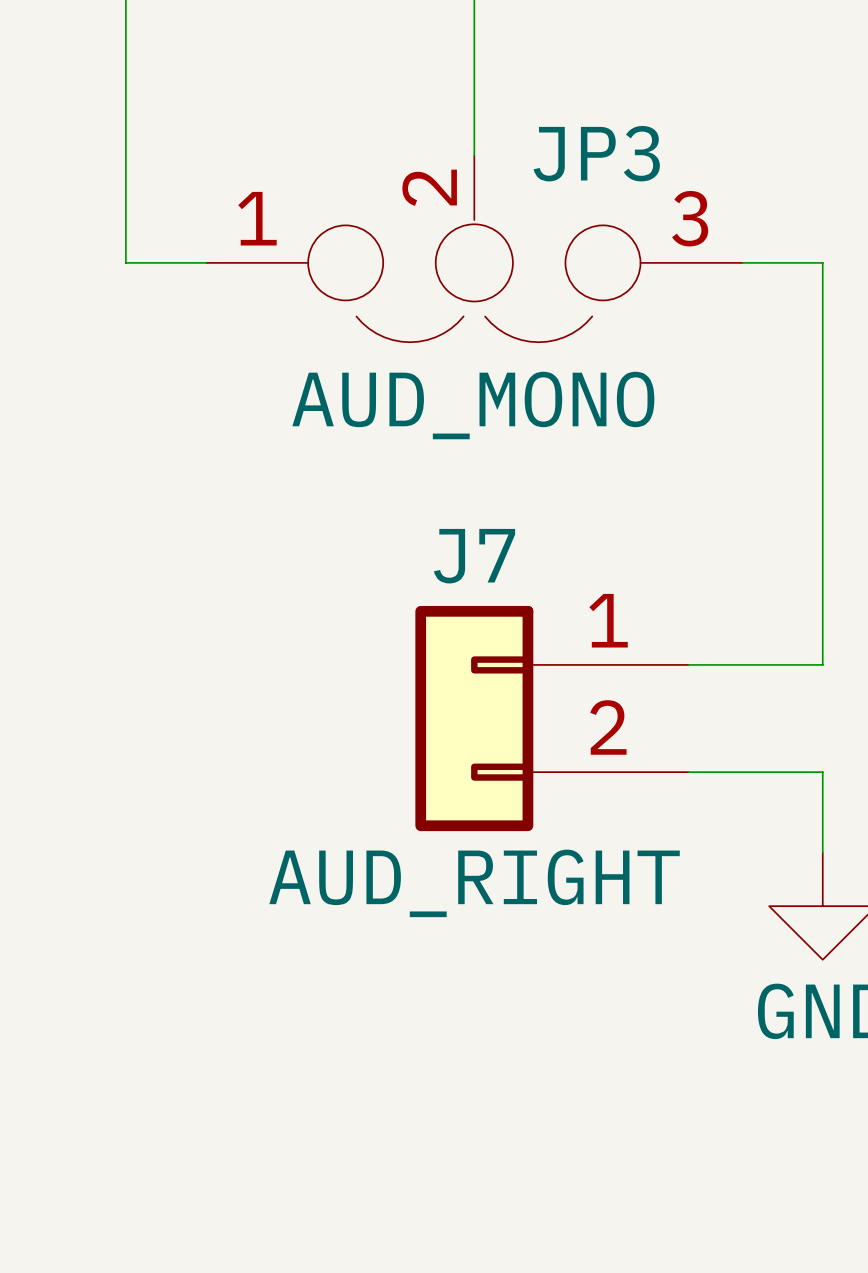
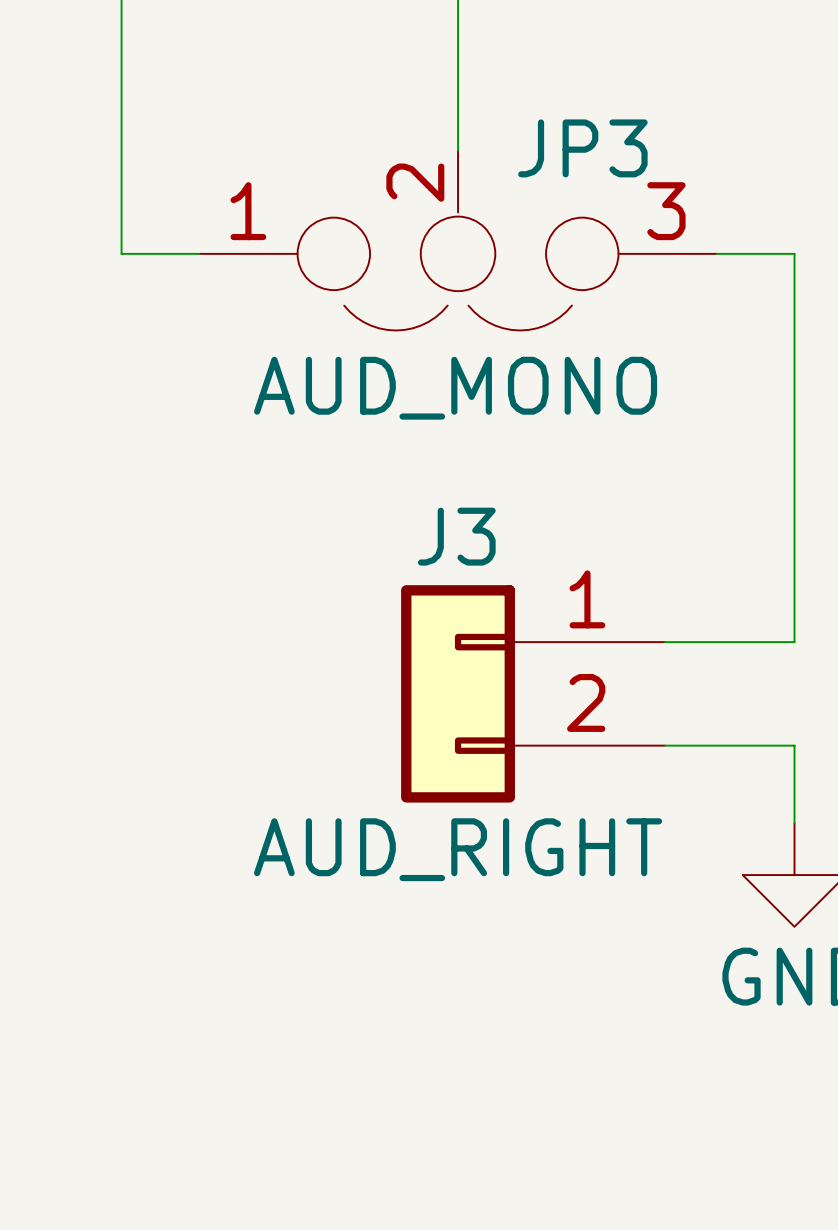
J7 name: J7 (474, 556) -> J3 (456, 536)

